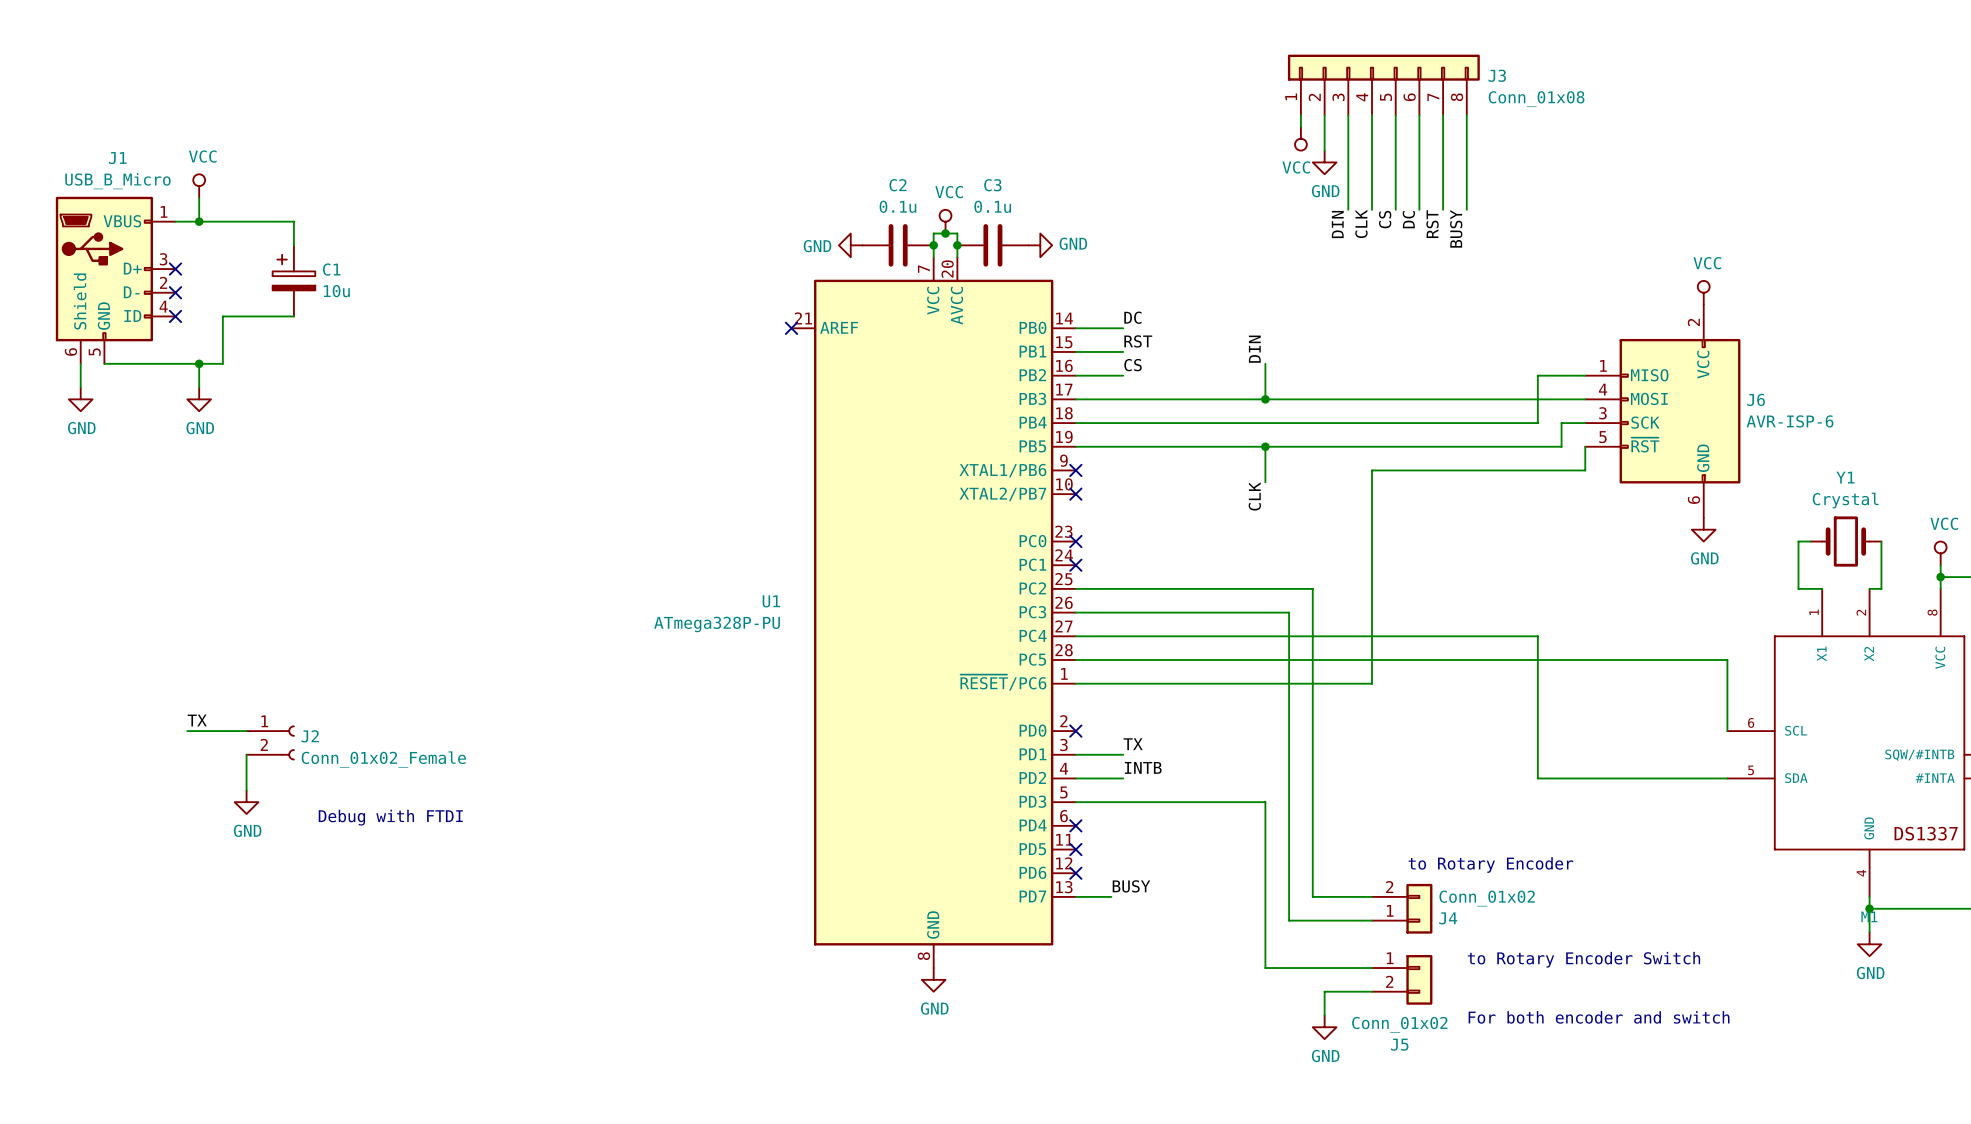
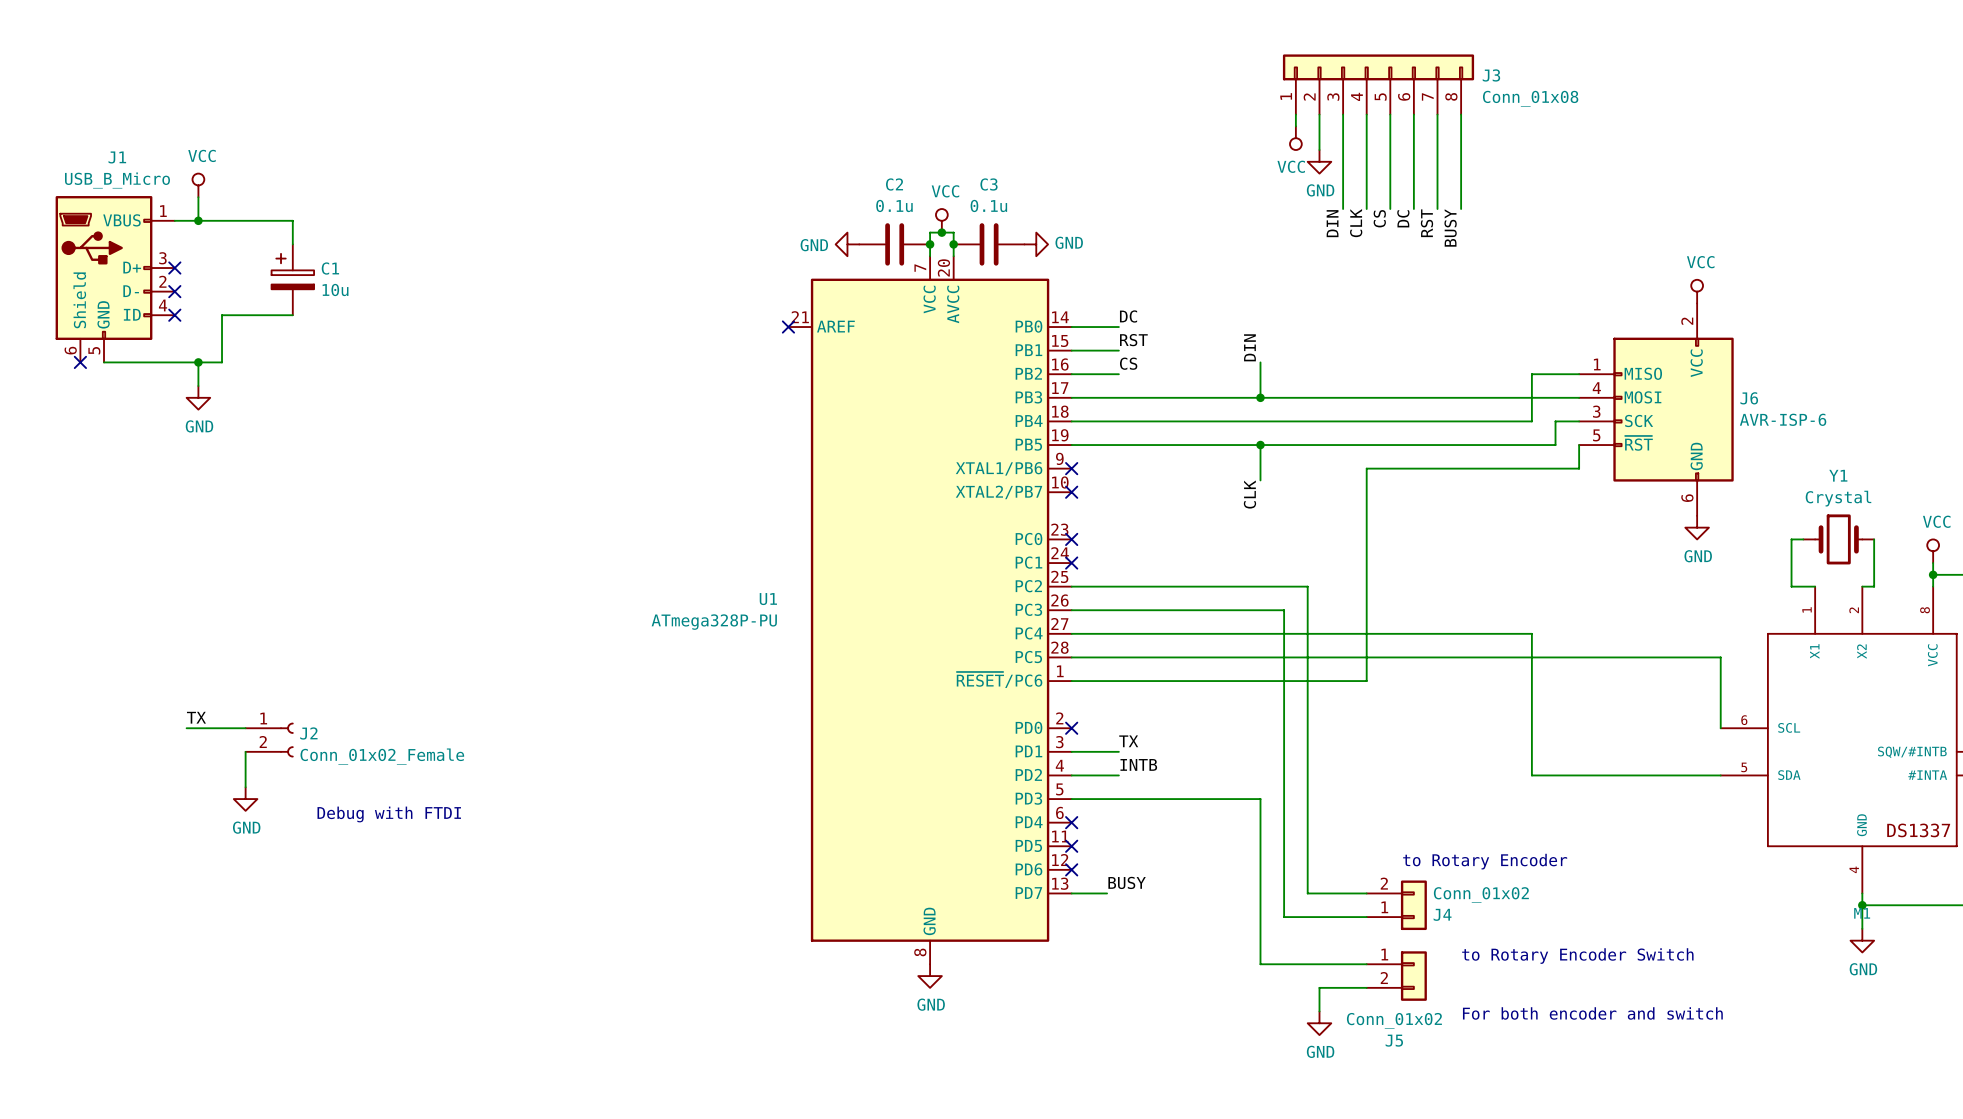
wire: (80, 363) (80, 387) -> none
no-connect mark: none -> (80, 362)
power symbol: GND (80, 399) -> none

